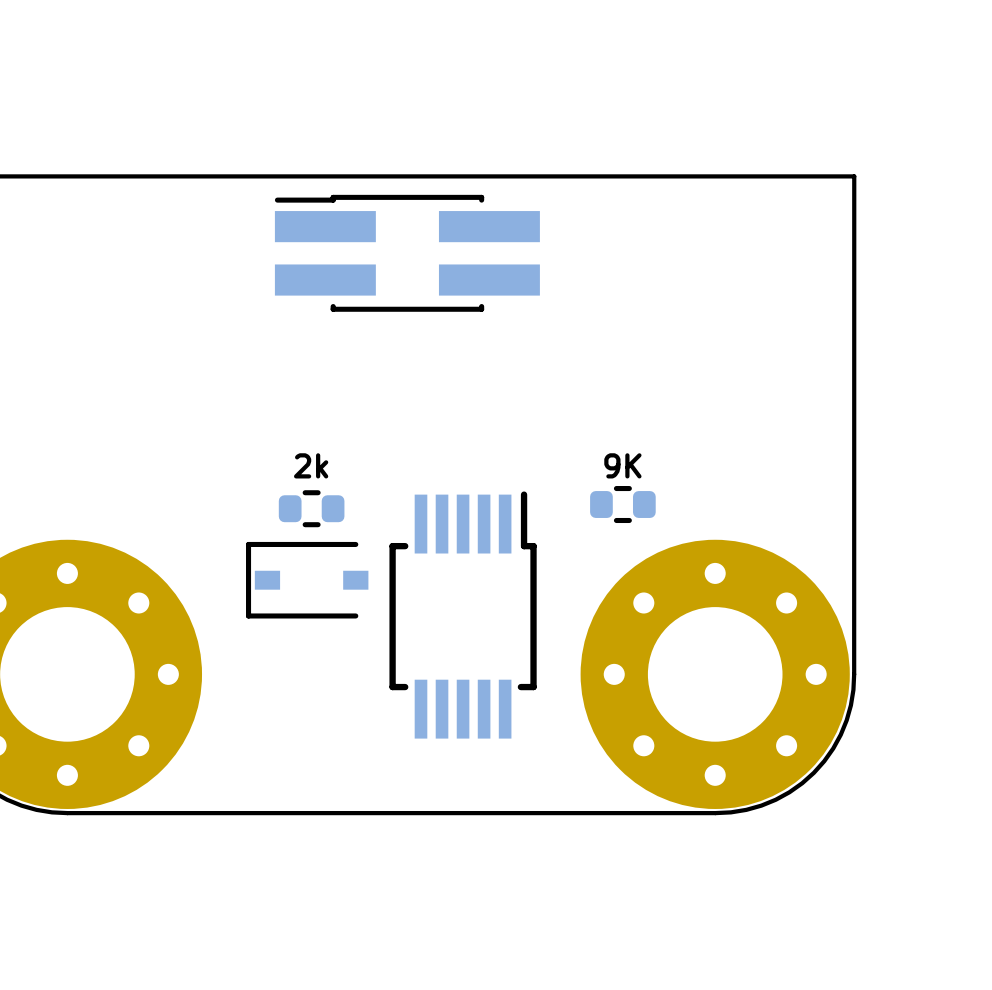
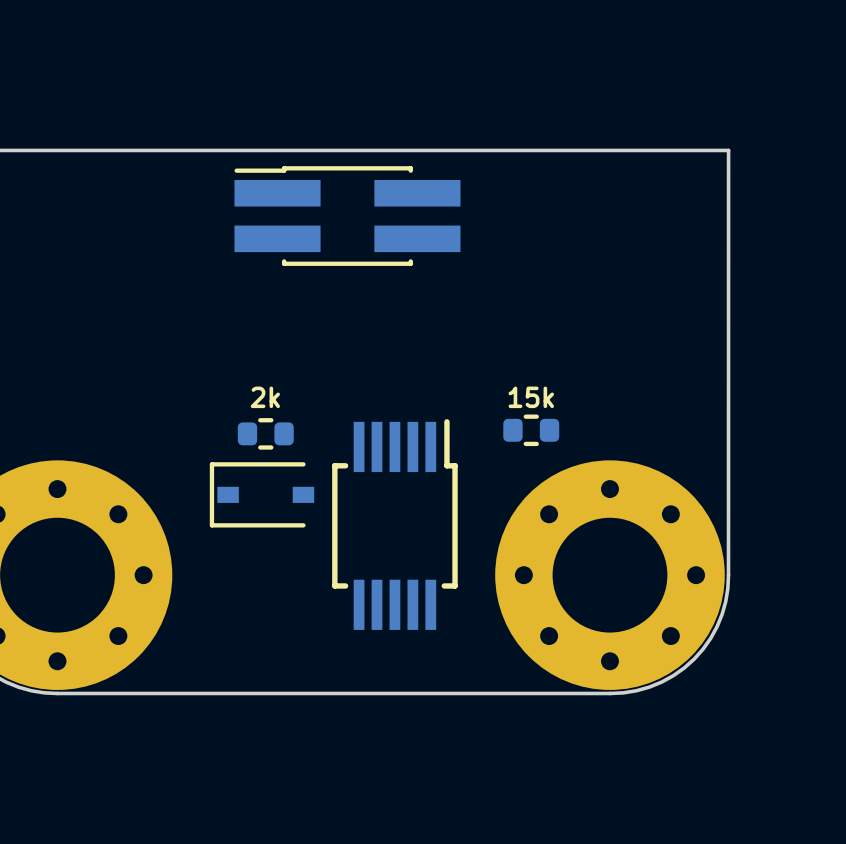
part text: 9K (622, 465) -> 15k (531, 397)

